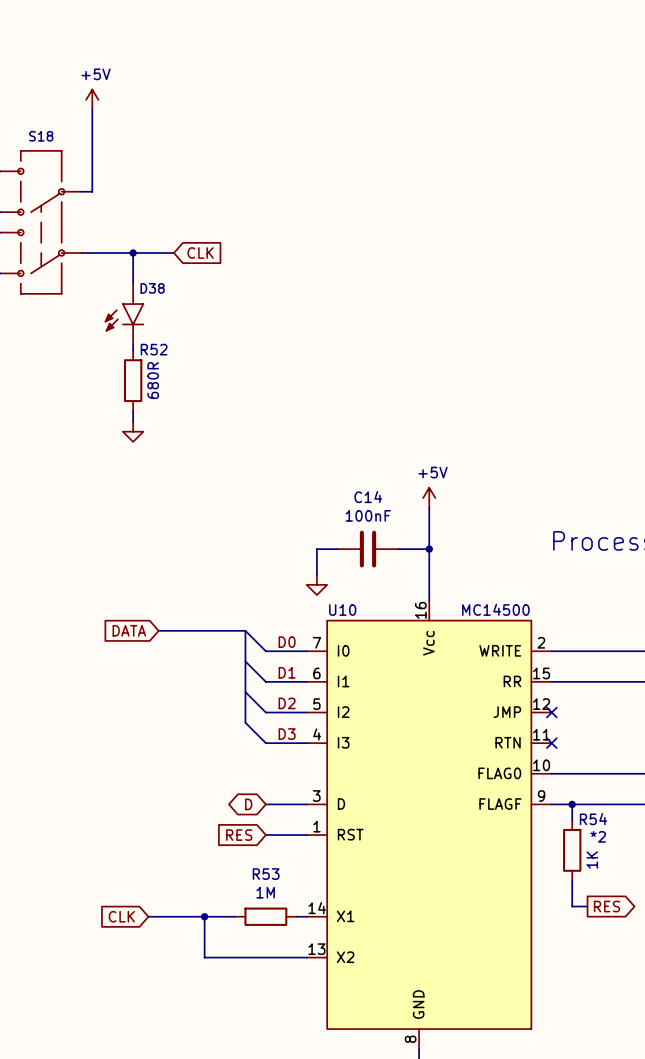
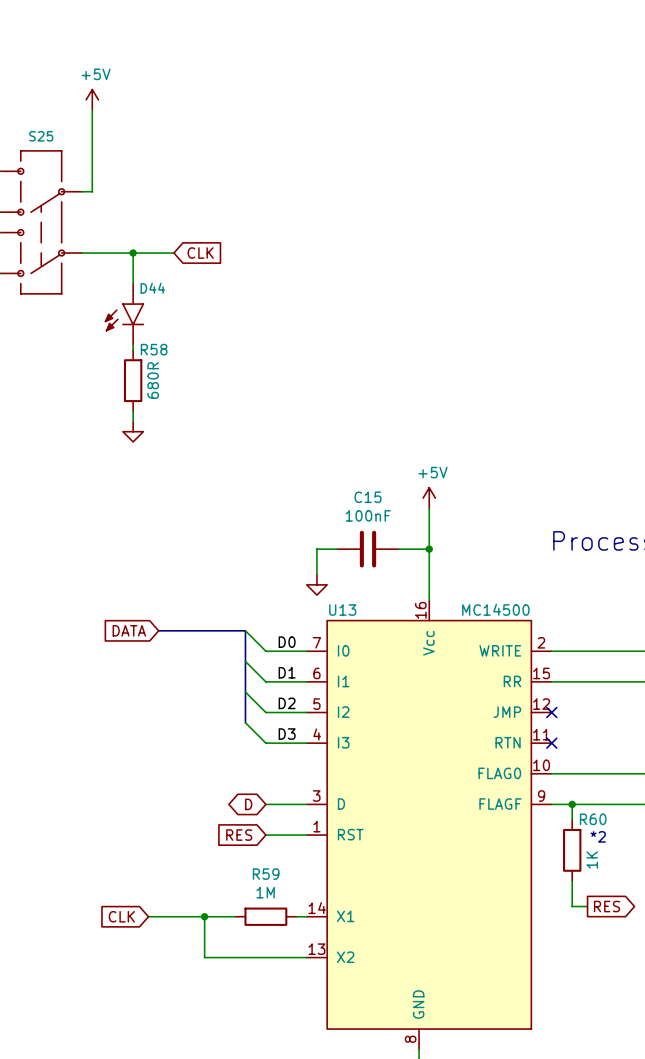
S18 name: S18 (41, 136) -> S25 (41, 136)
D38 name: D38 (152, 288) -> D44 (152, 288)
R52 name: R52 (154, 349) -> R58 (154, 349)
C14 name: C14 (368, 497) -> C15 (367, 497)
U10 name: U10 (342, 610) -> U13 (342, 610)
R54 name: R54 (593, 819) -> R60 (593, 819)
R53 name: R53 (266, 874) -> R59 (266, 874)

